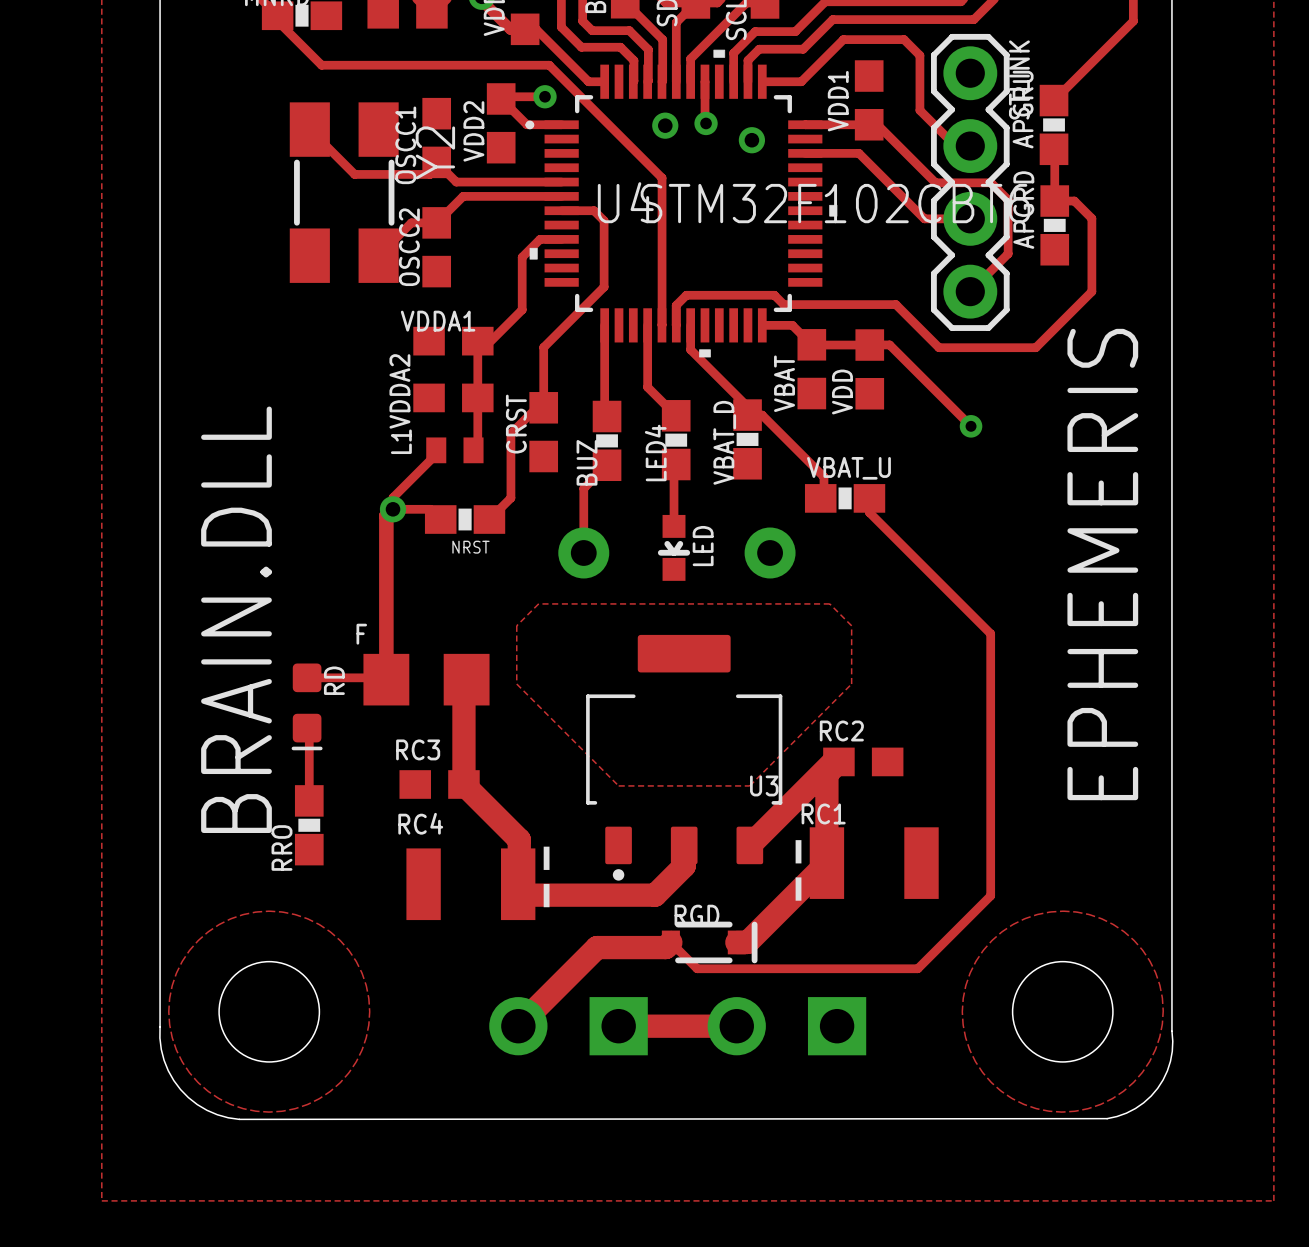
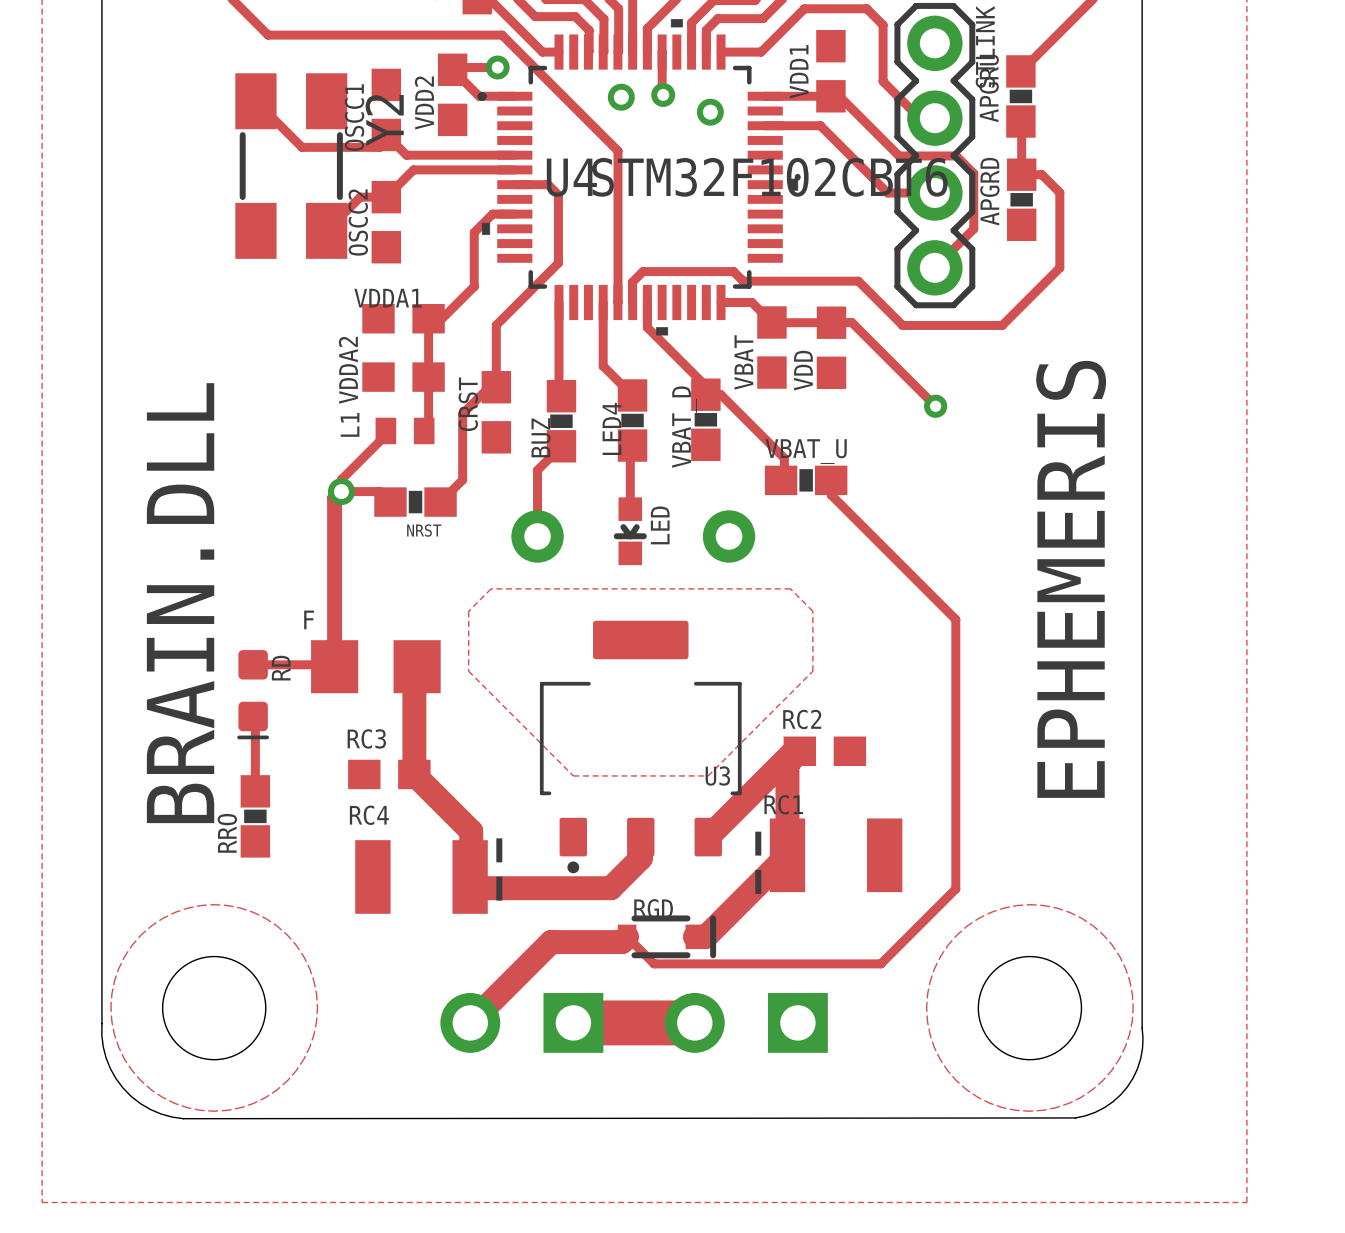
track width: thin (618, 1026) (736, 1026) -> thick (573, 1022) (694, 1022)

